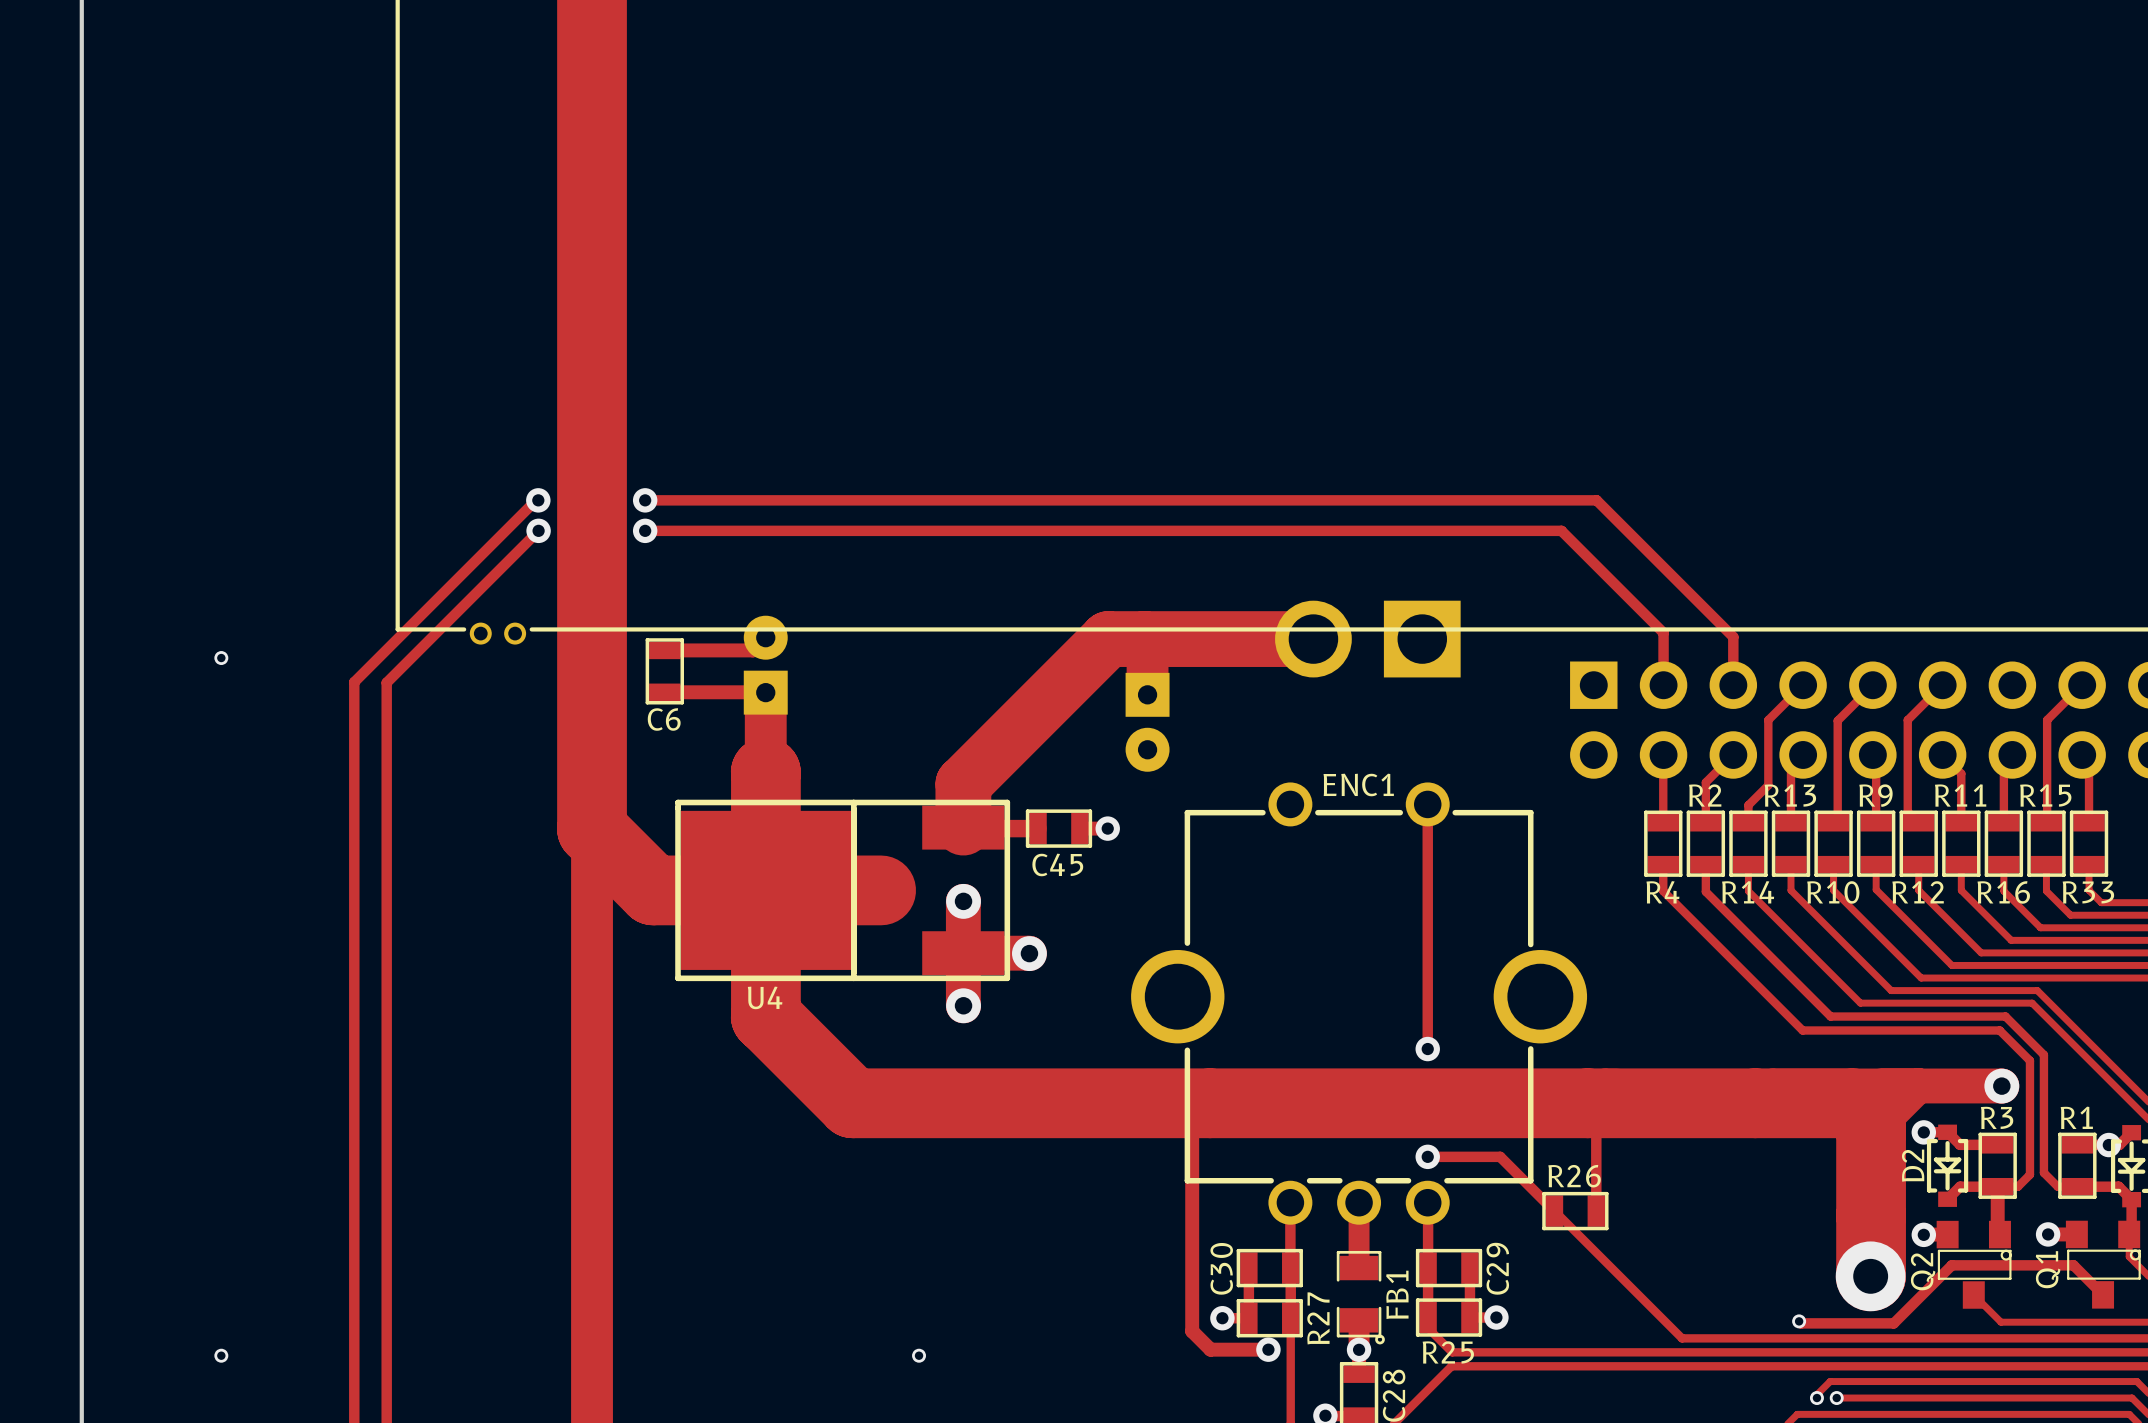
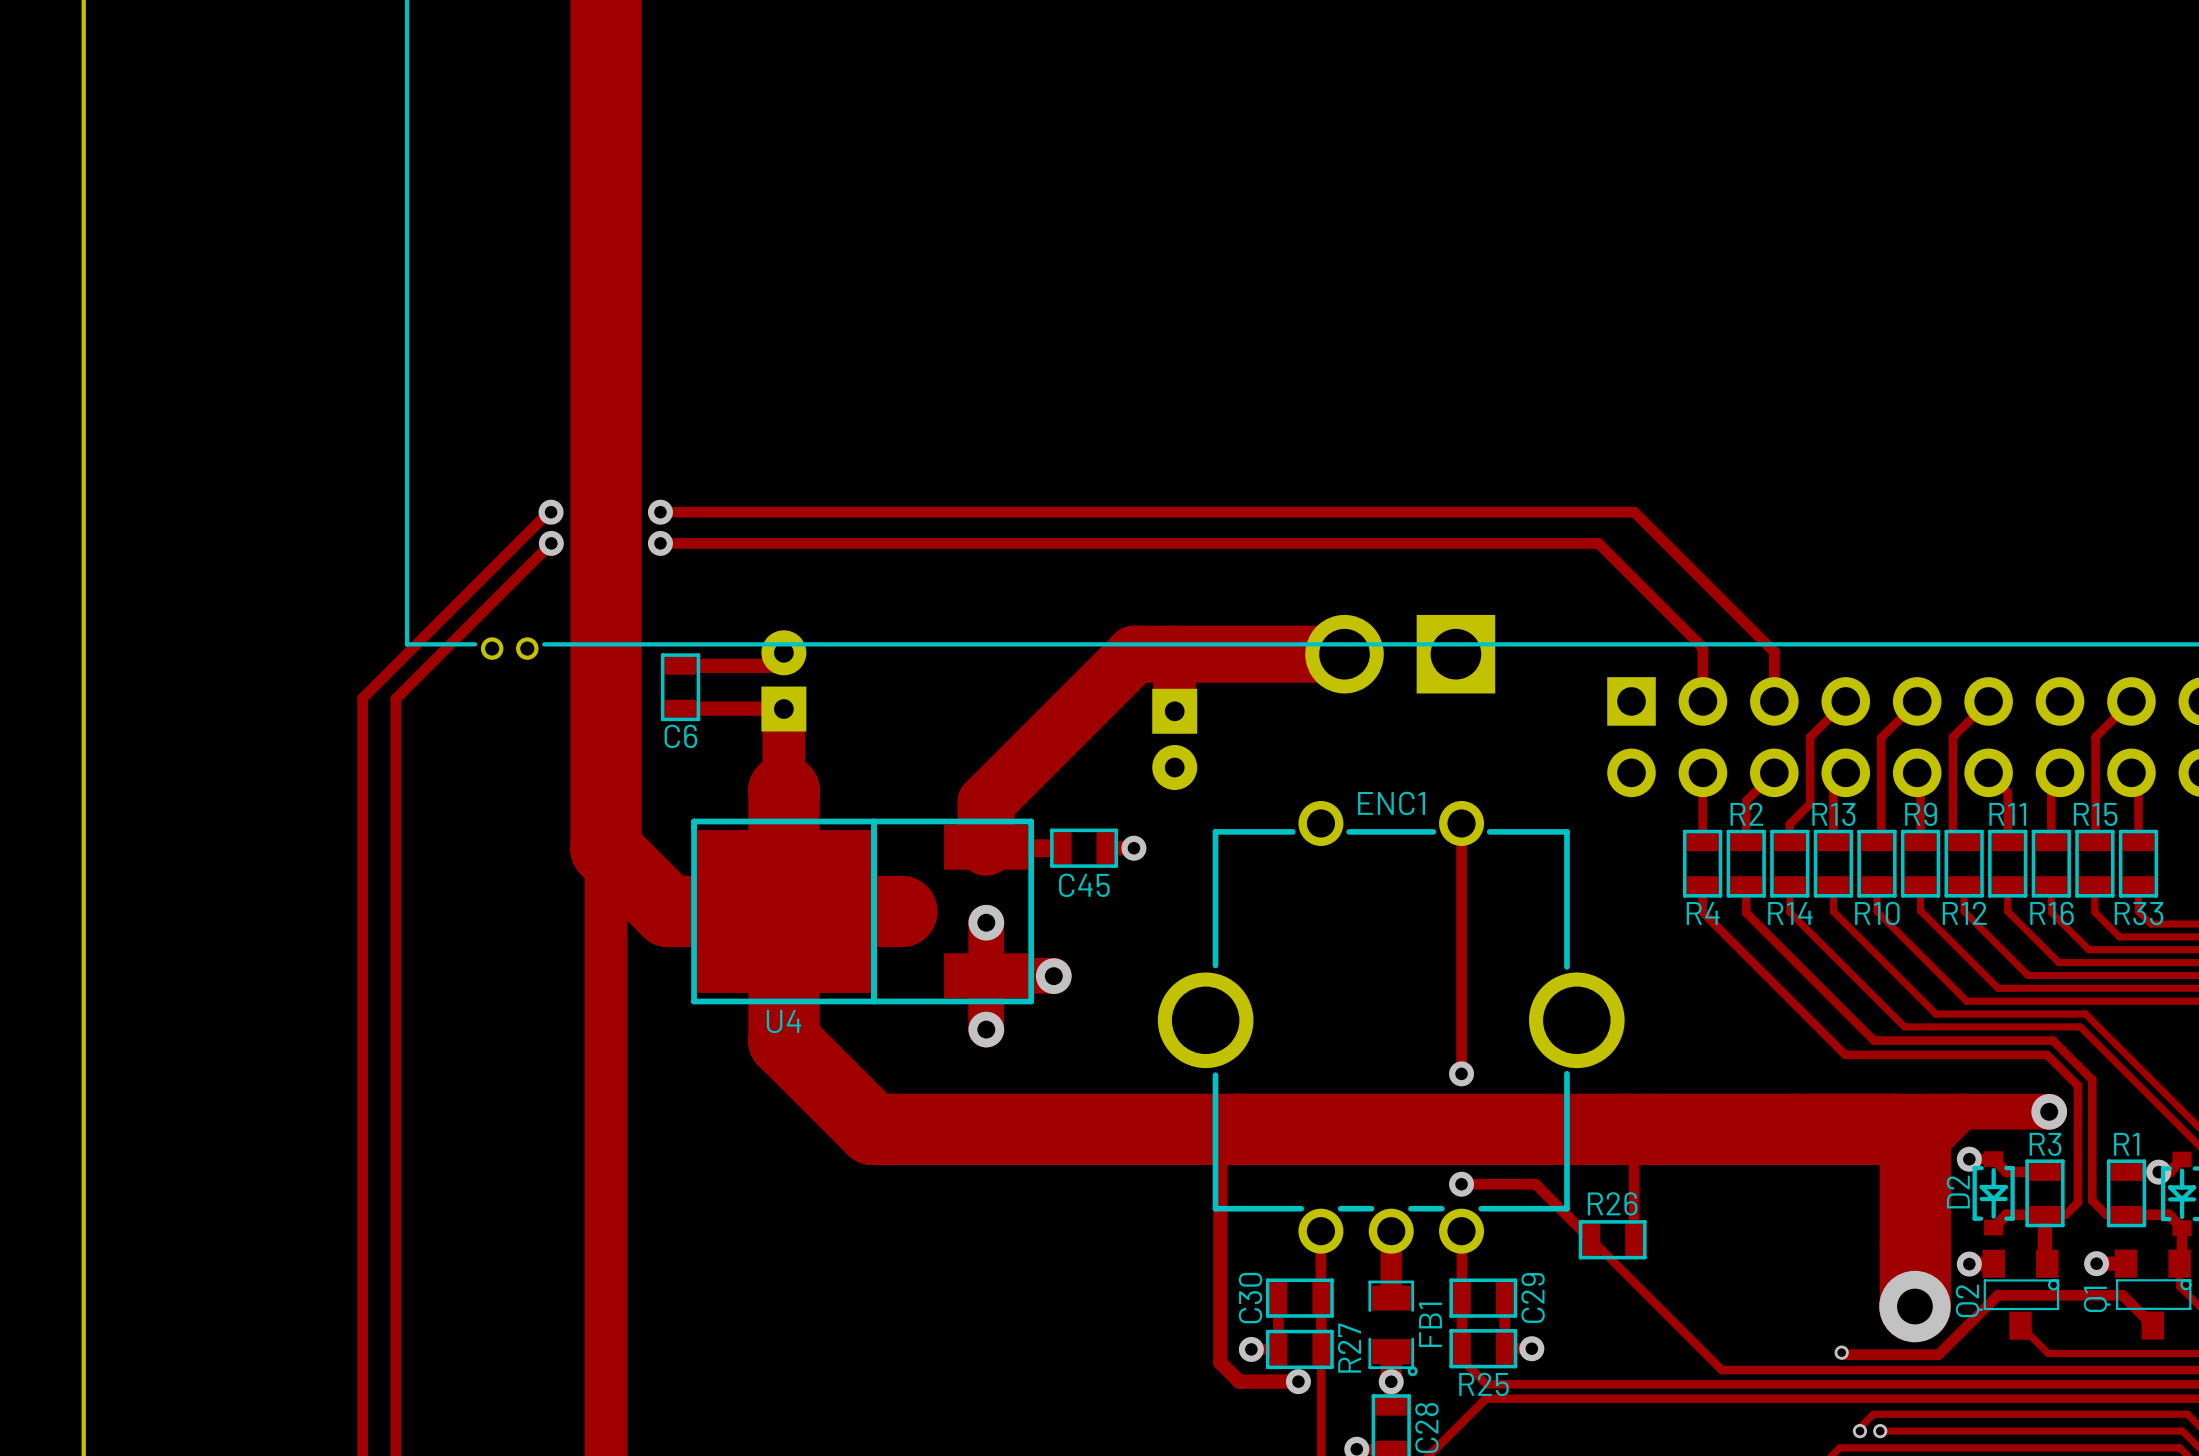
via: (221, 658) -> none
via: (221, 1355) -> none
via: (919, 1355) -> none

